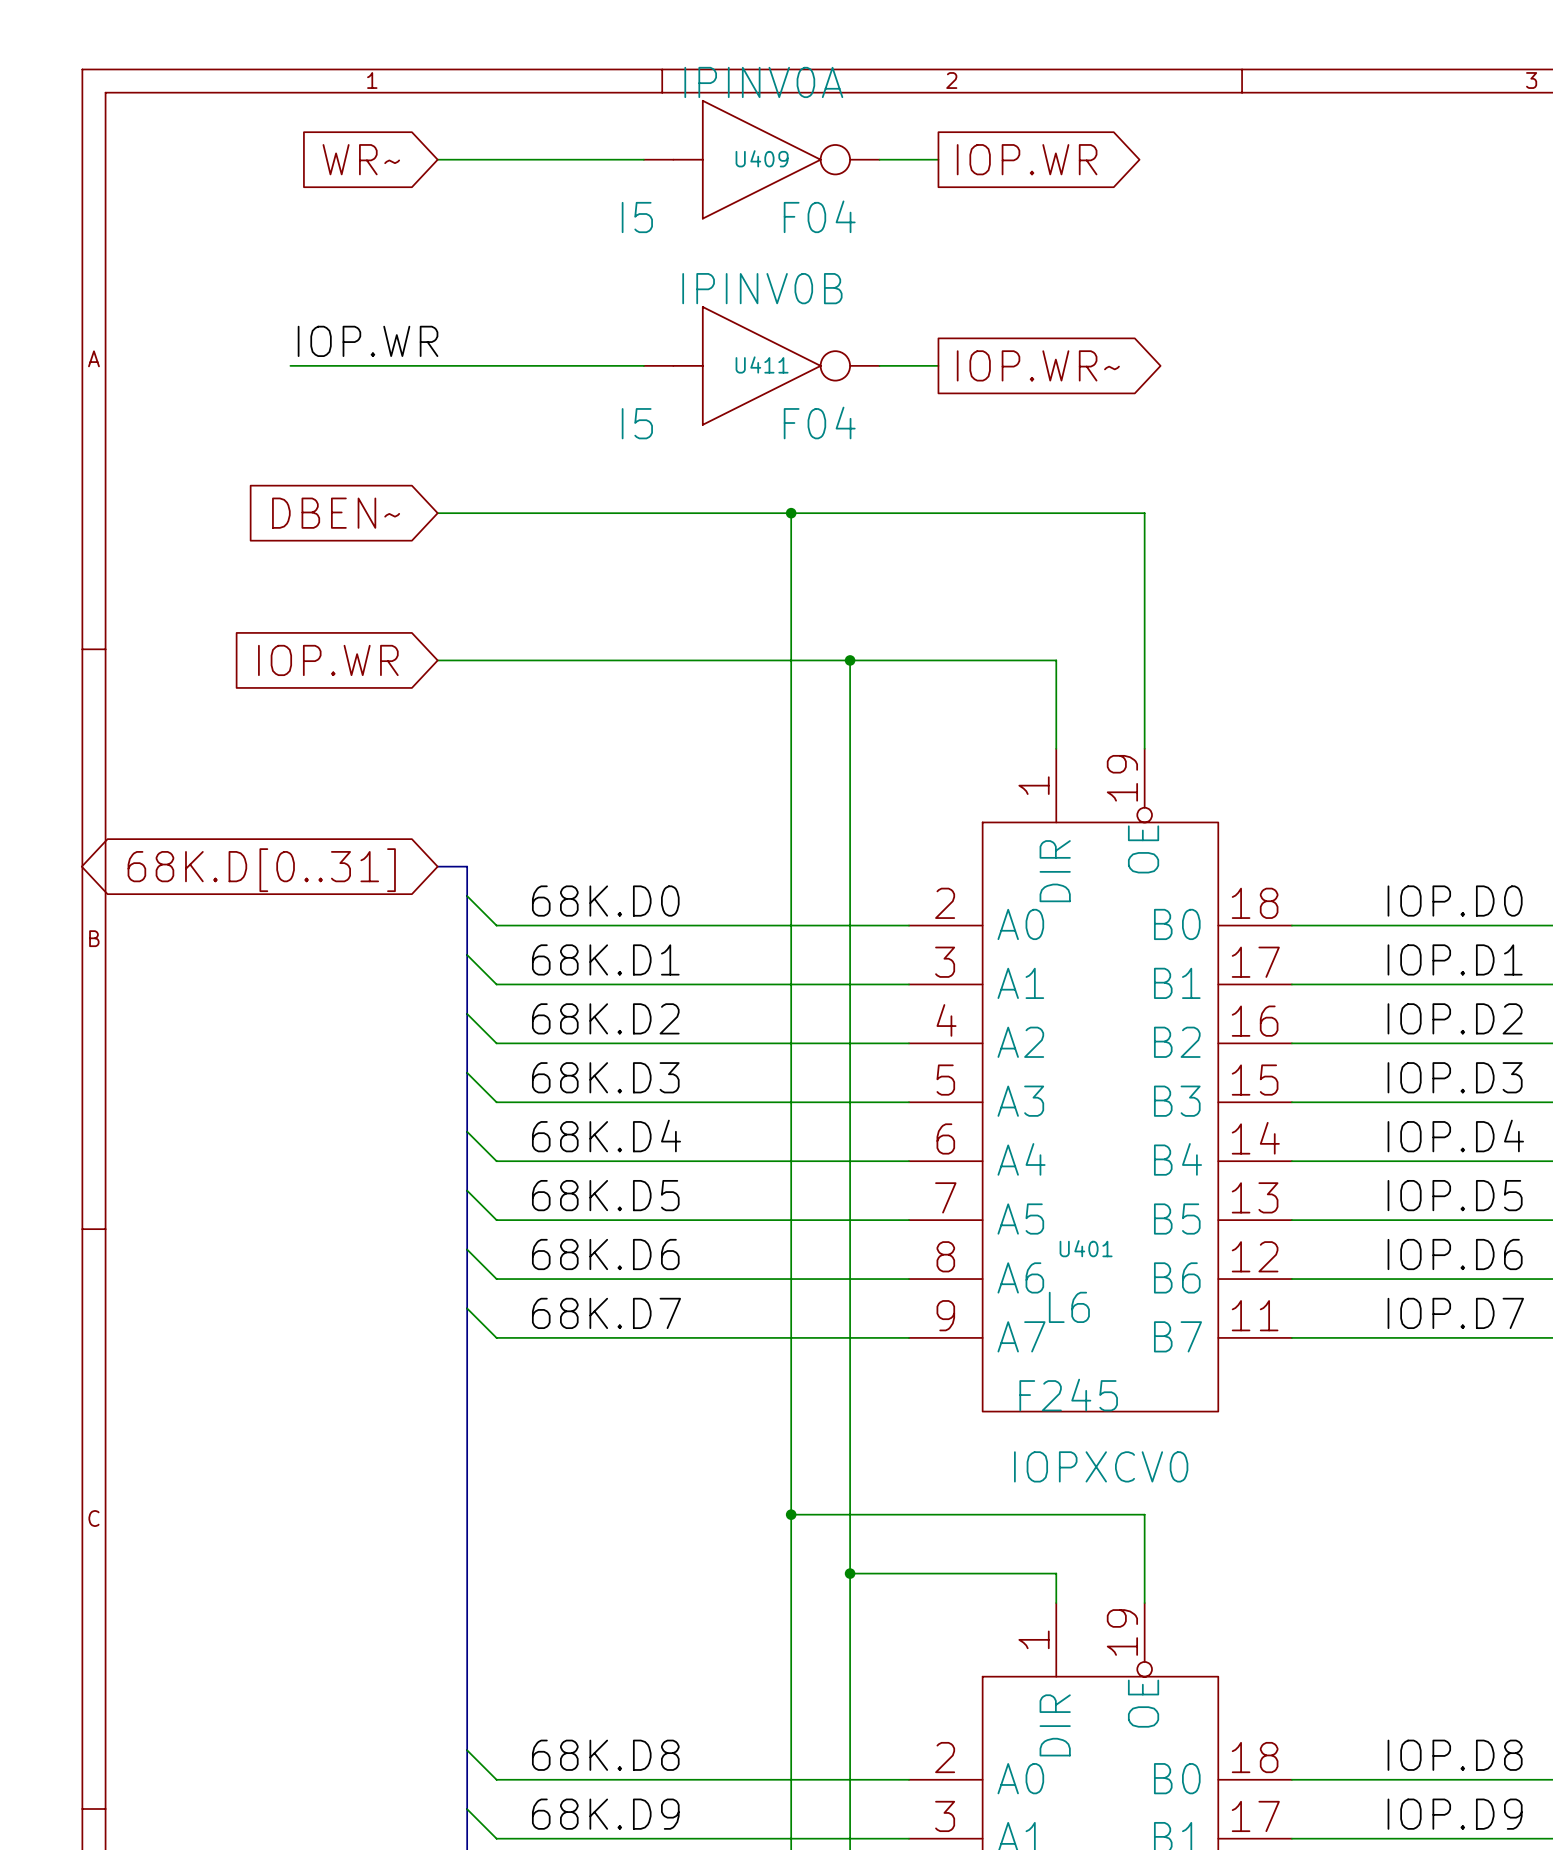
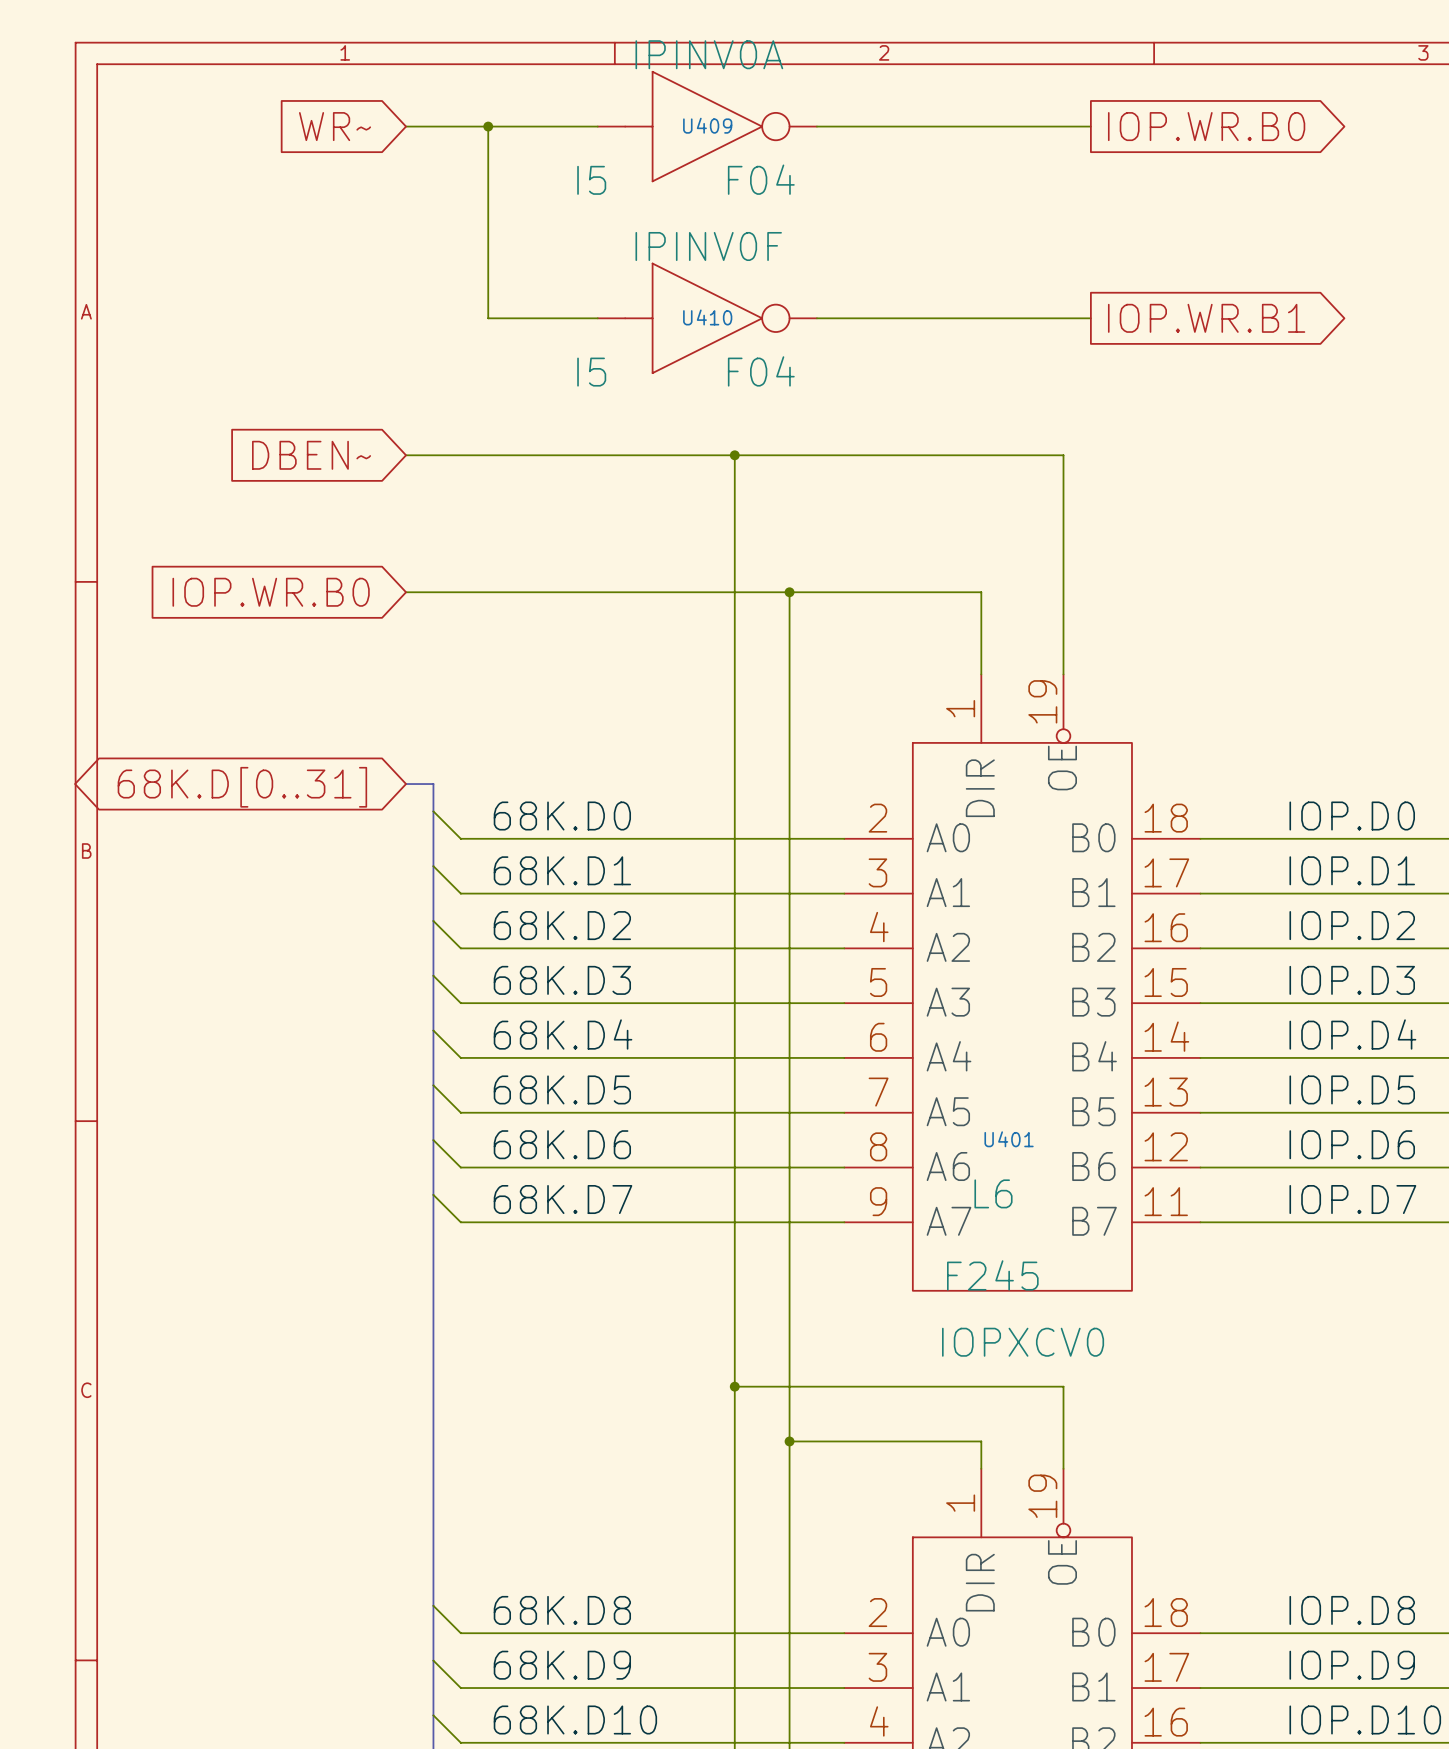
junction: none -> (488, 126)
wire: none -> (871, 126) (1090, 126)
global label: IOP.WR (1027, 159) -> IOP.WR.B0 (1206, 126)
U411 text: IPINV0B (762, 288) -> IPINV0F (708, 246)
label: IOP.WR (368, 341) -> none
U411 name: U411 (762, 364) -> U410 (707, 317)
wire: (290, 365) (526, 365) -> (488, 126) (488, 318)
wire: none -> (871, 318) (1090, 318)
global label: IOP.WR~ (1038, 365) -> IOP.WR.B1 (1206, 318)
global label: IOP.WR (328, 660) -> IOP.WR.B0 (271, 592)

